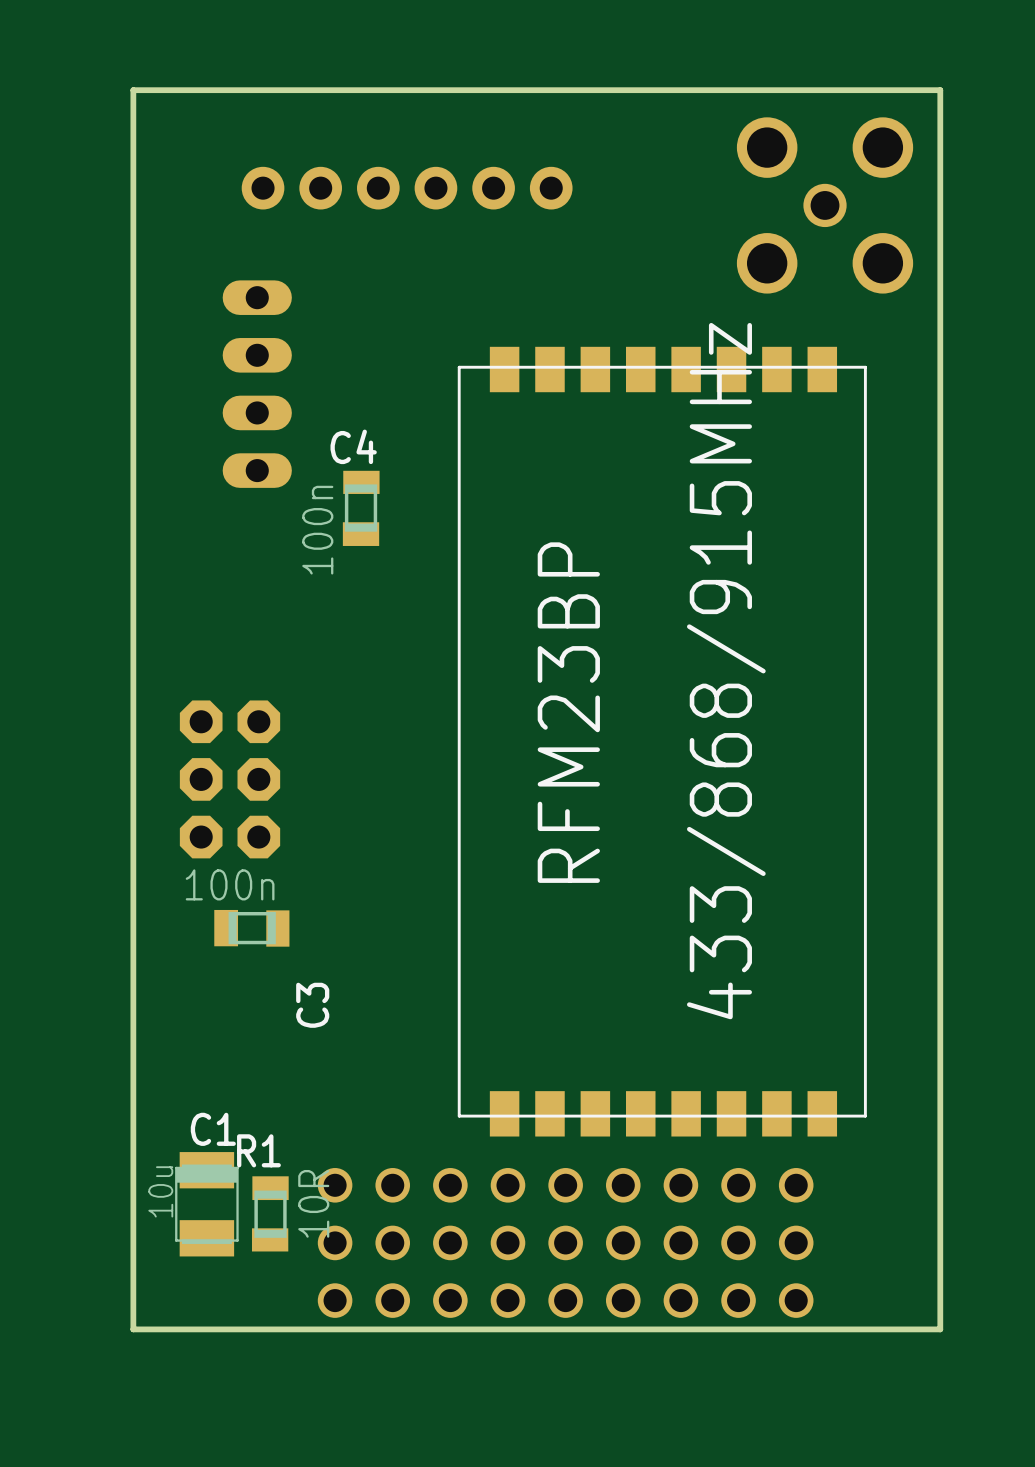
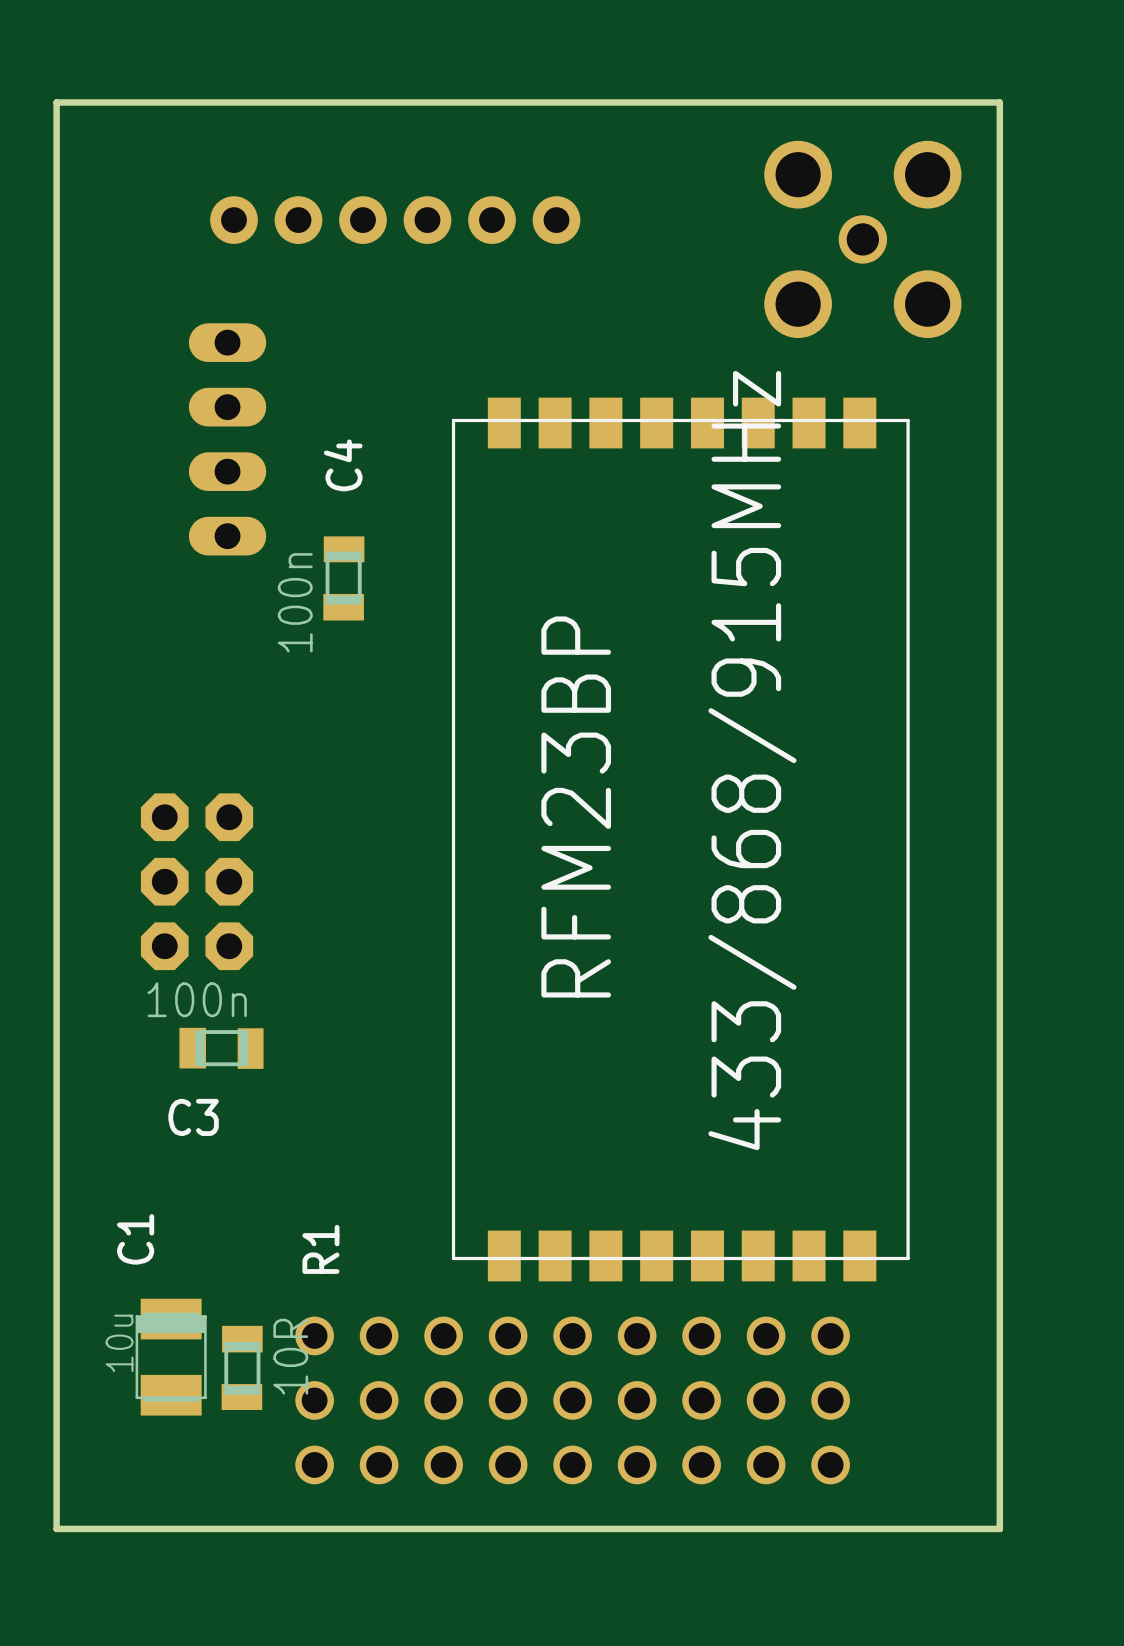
board edge: (940, 90) (133, 90) (133, 1329) (940, 1329) (940, 90) -> (999, 102) (999, 1528) (56, 1528) (56, 102) (999, 102)
C4 name rotation: 0° (353, 446) -> 90° counterclockwise (343, 465)
C3 name rotation: 0° (312, 1005) -> 90° clockwise (193, 1117)
C3 name position: C3 (312, 1005) -> C3 (193, 1117)
C1 name rotation: 0° (213, 1129) -> 90° counterclockwise (135, 1239)
R1 name rotation: 0° (258, 1150) -> 90° counterclockwise (320, 1249)
R1 name position: R1 (258, 1150) -> R1 (320, 1249)

